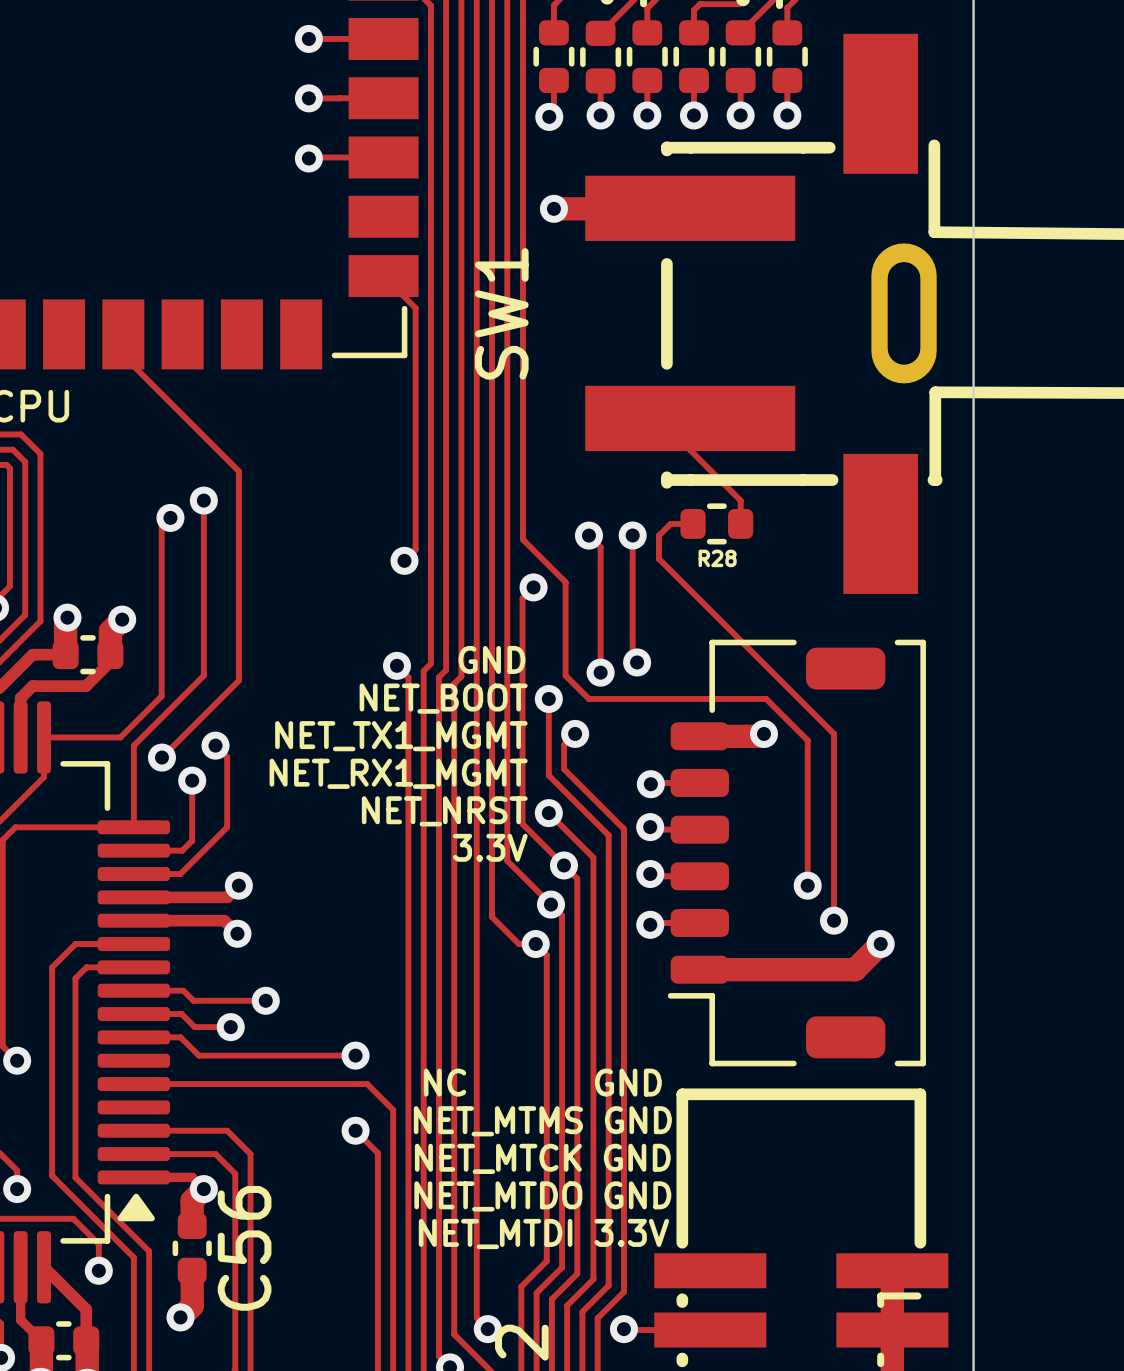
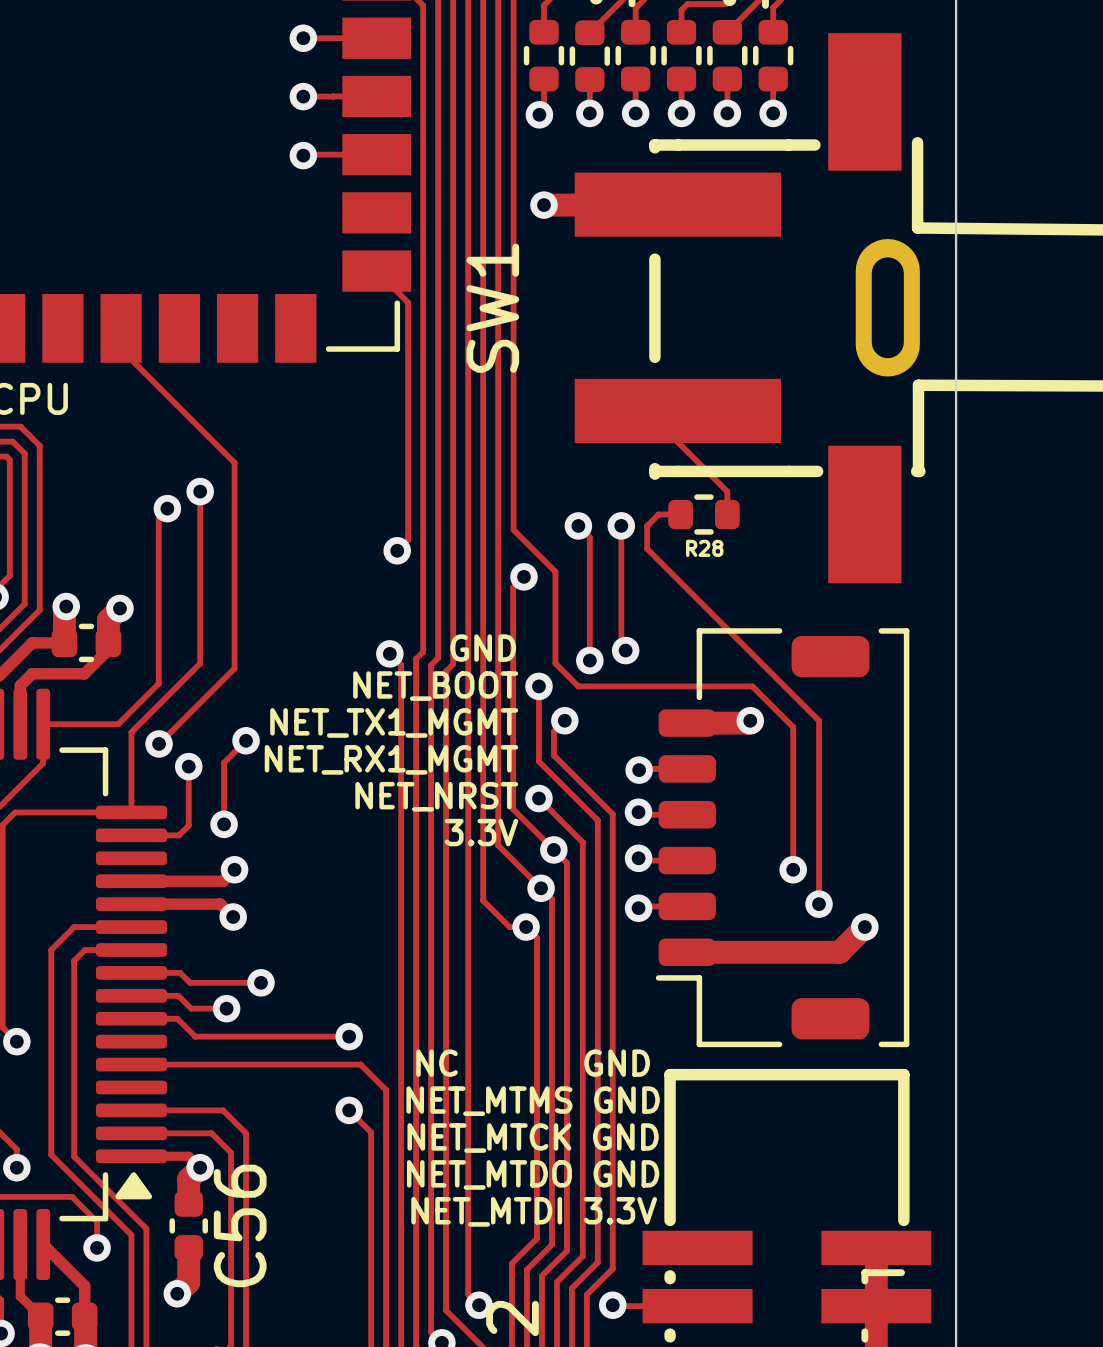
track: (215, 745) (227, 757) (227, 827) (180, 874) (133, 874) -> none
via position: (215, 745) -> (246, 740)
track: none -> (246, 740) (224, 762) (224, 824)
via: none -> (224, 824)

